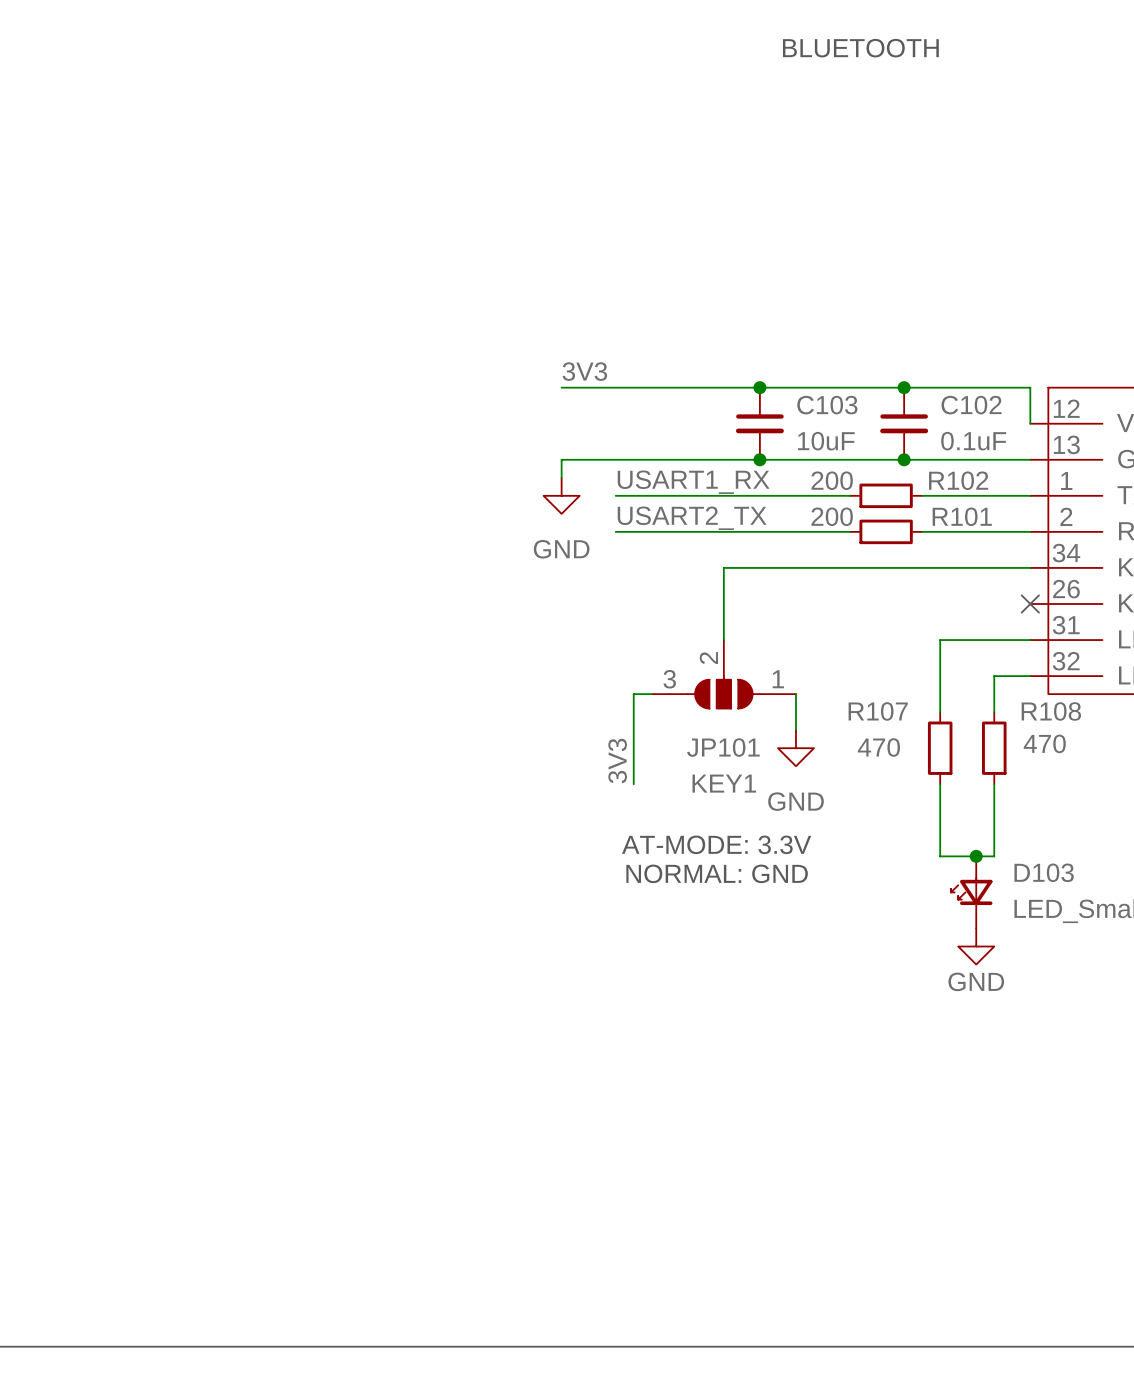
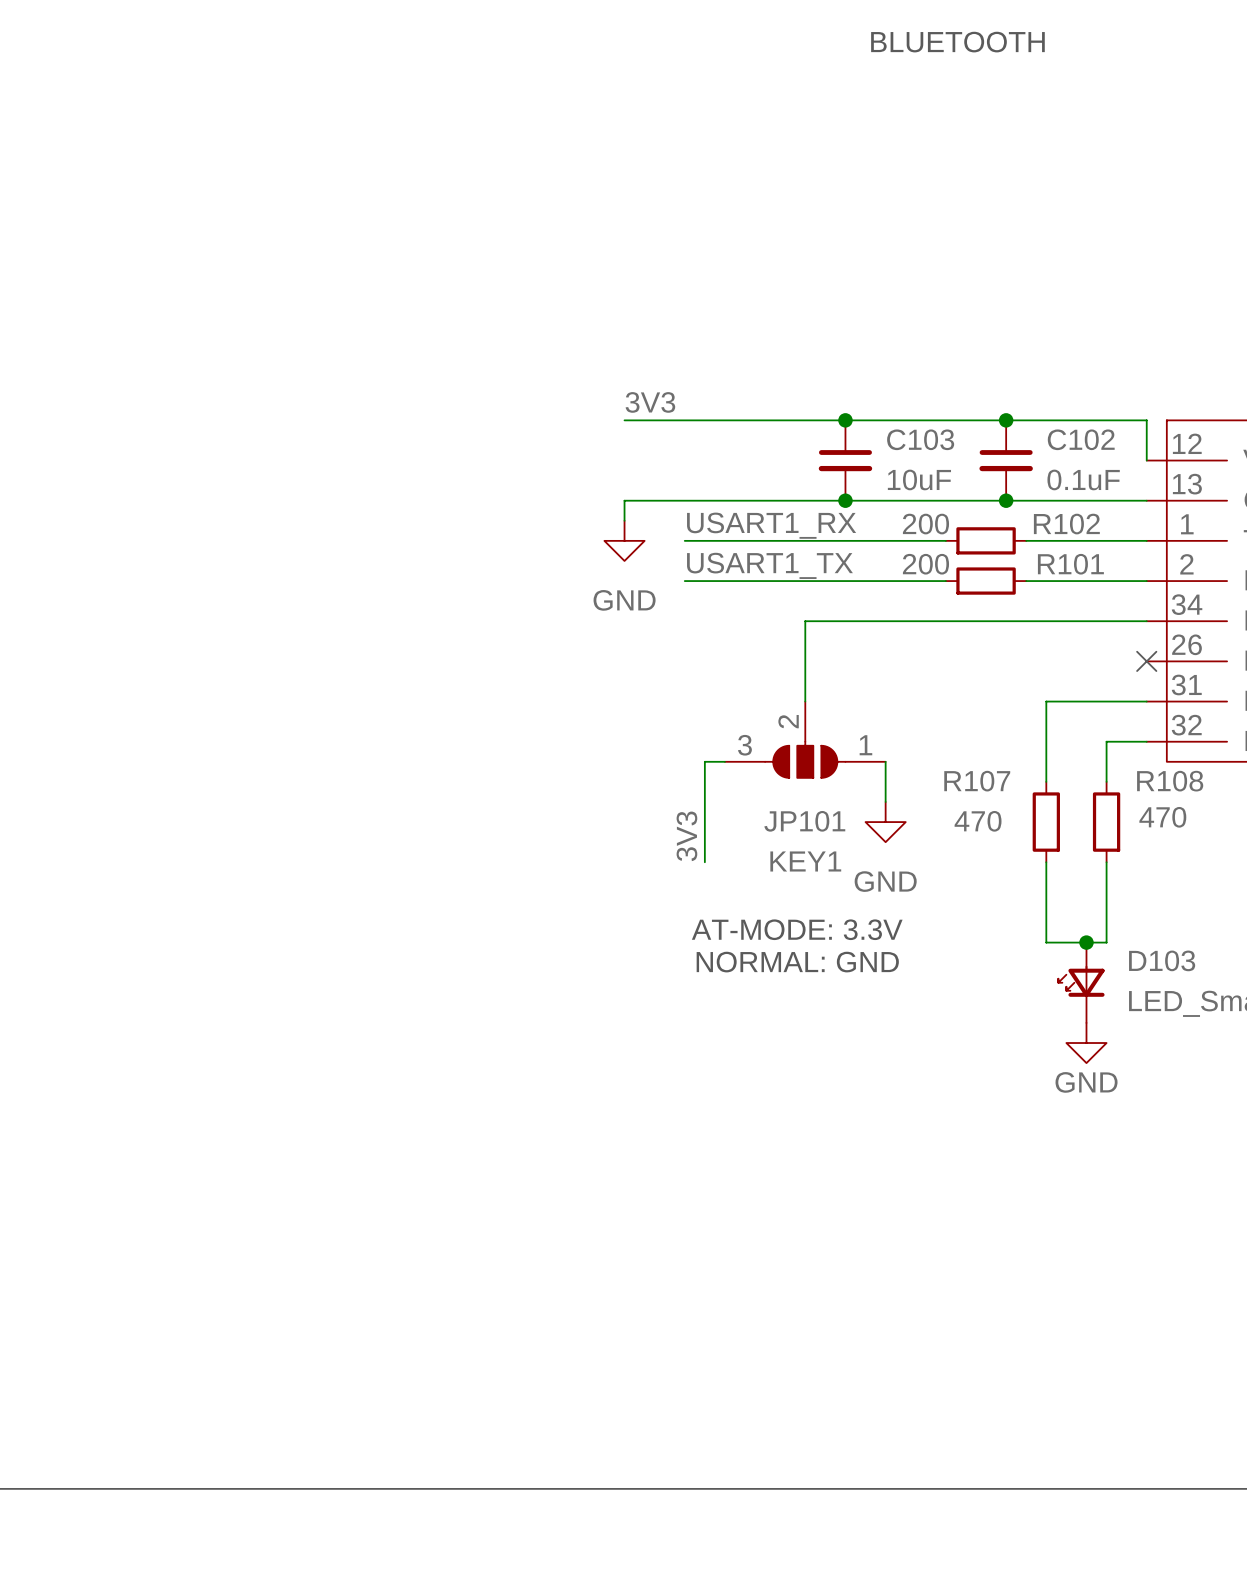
label: USART2_TX (692, 518) -> USART1_TX (769, 565)

